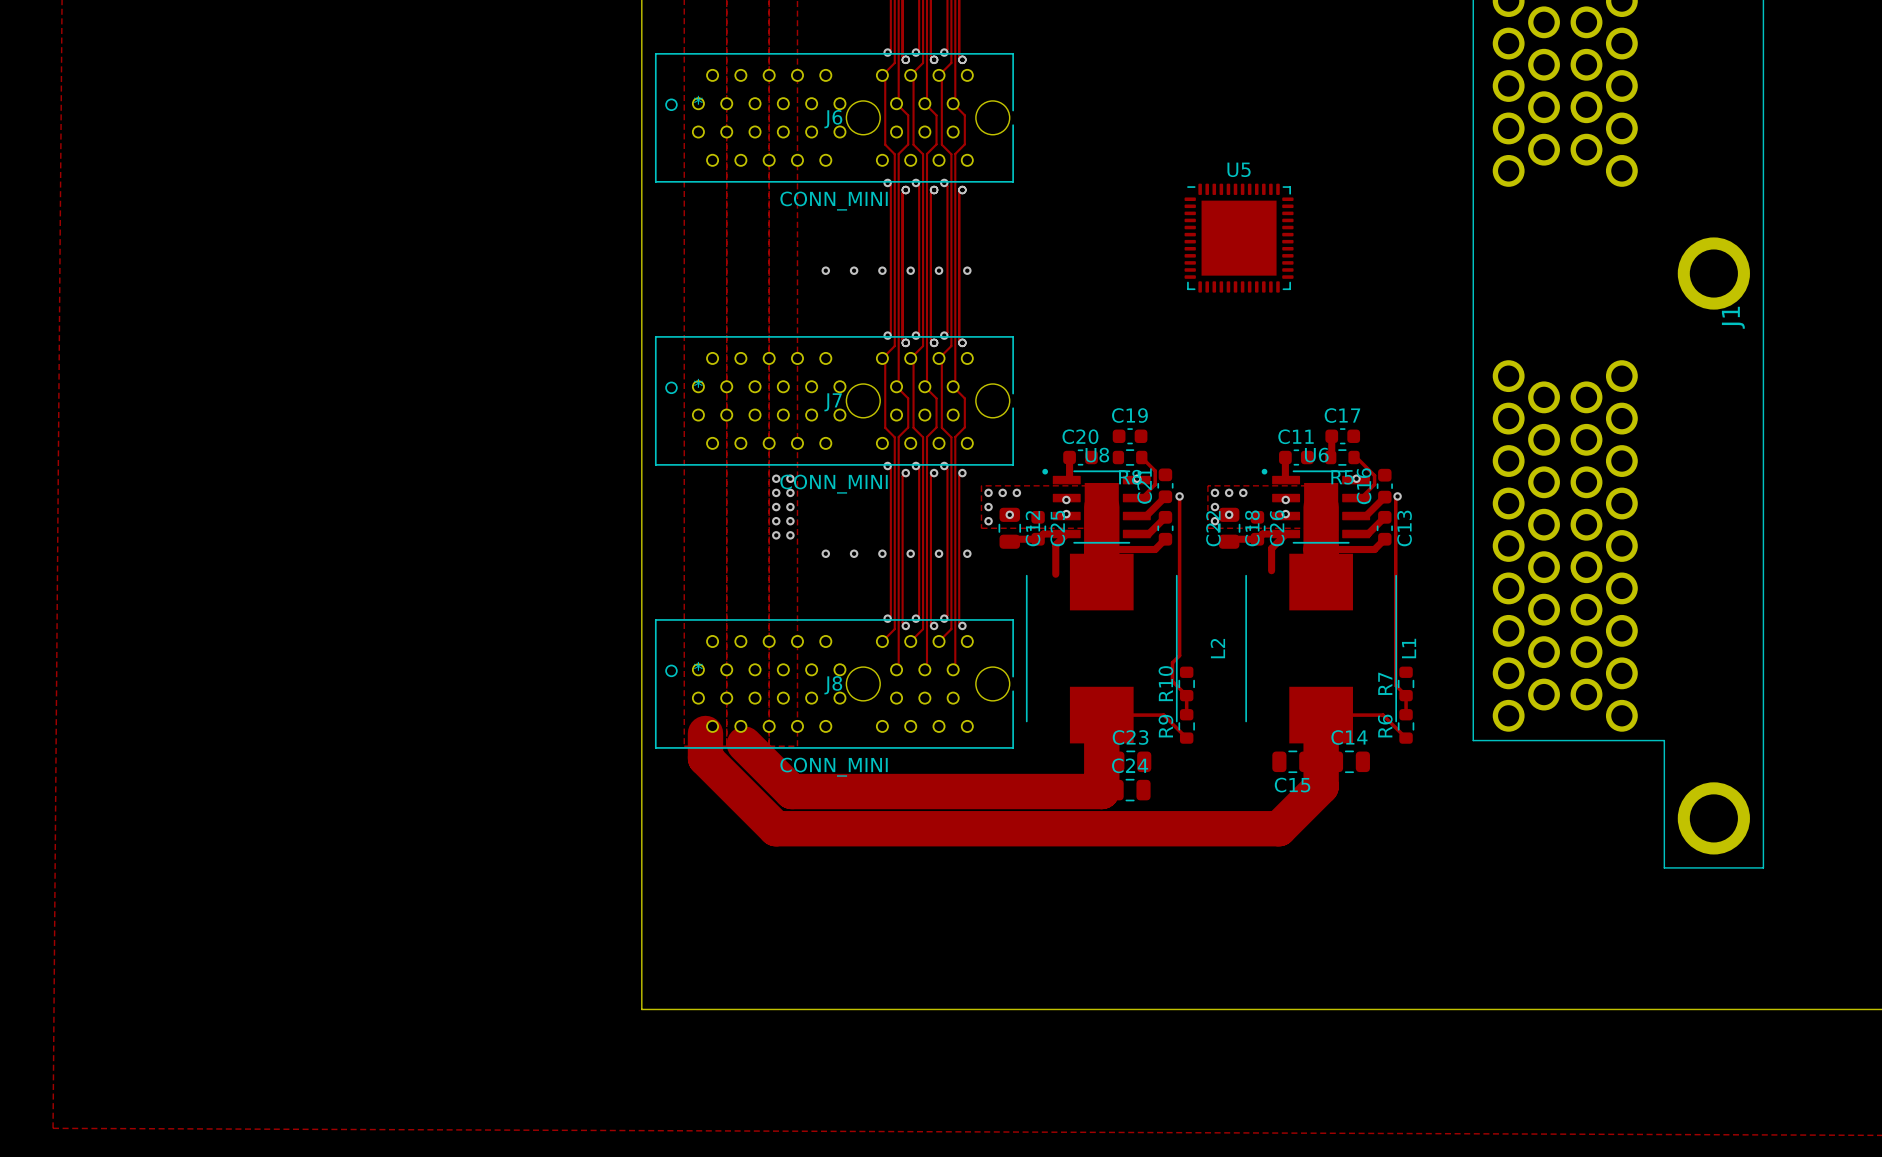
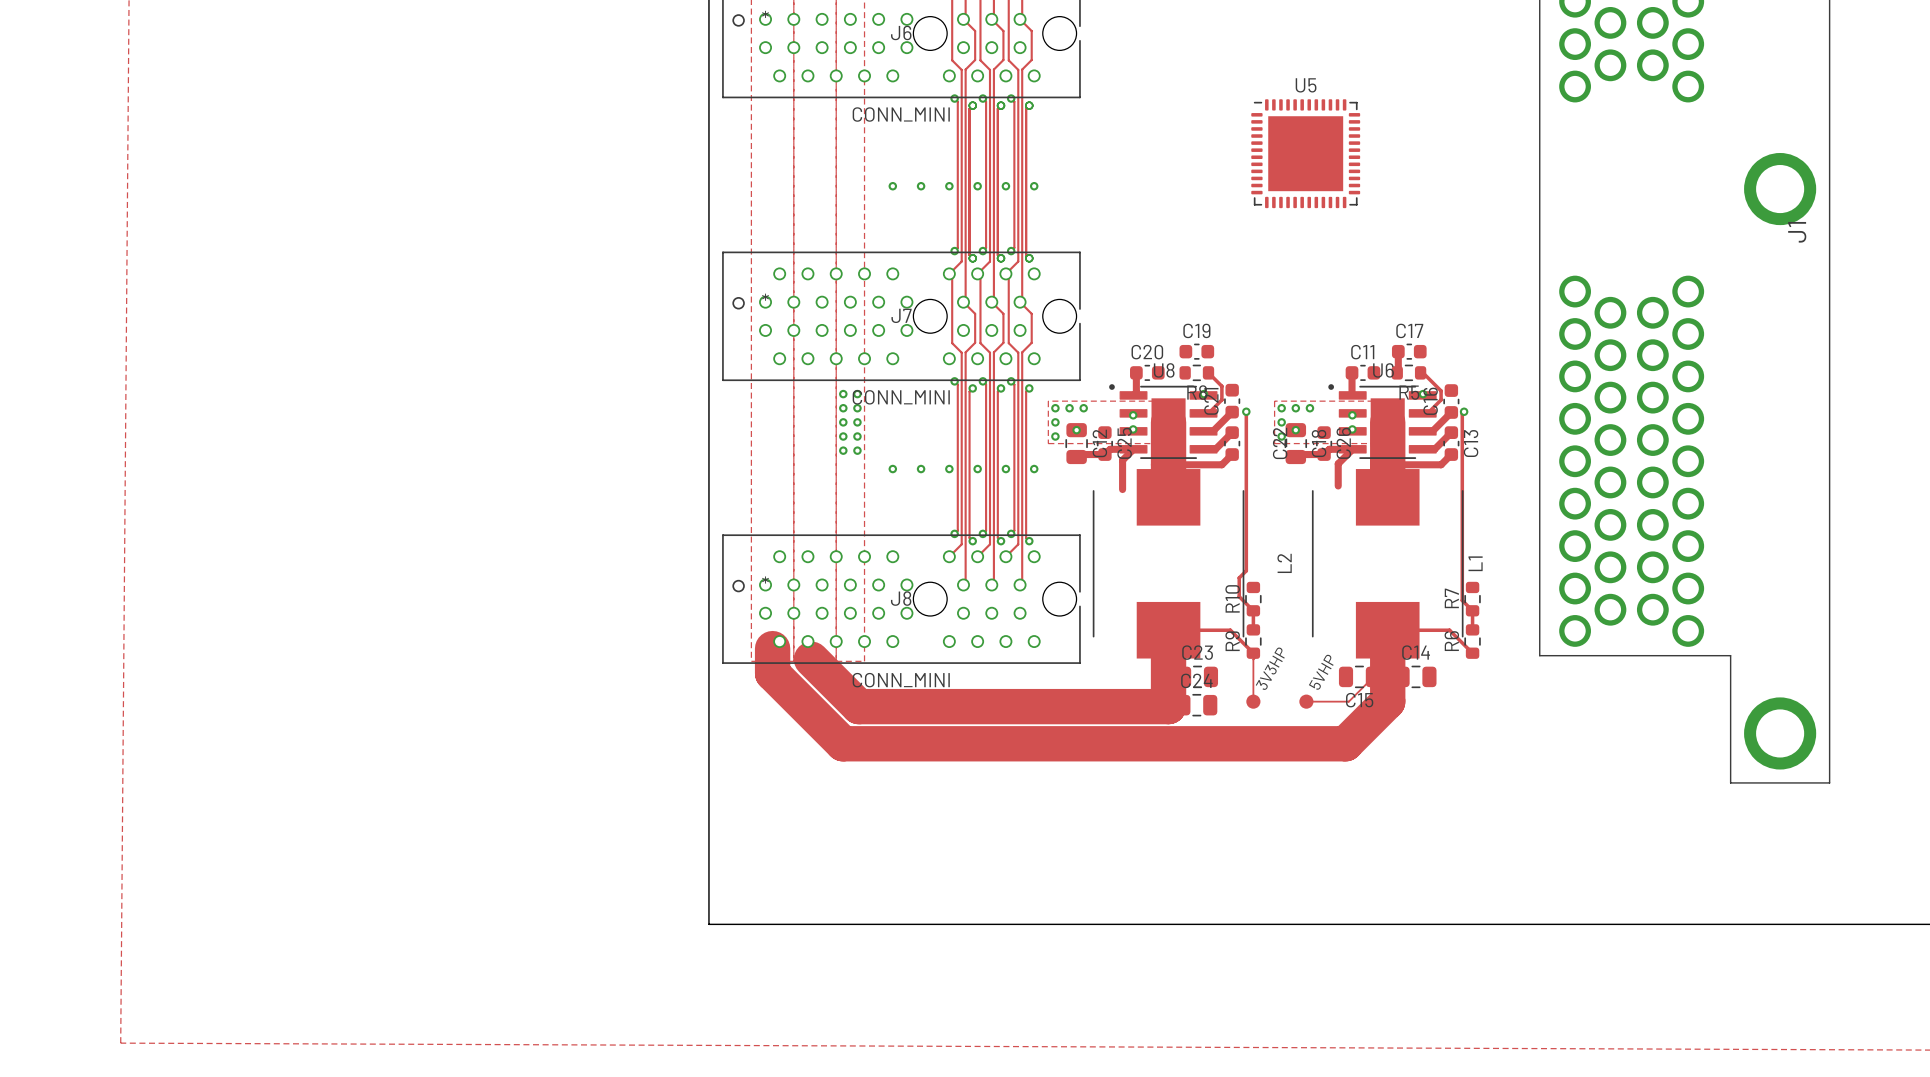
track: none -> (1256, 656) (1253, 659) (1253, 701)
track: none -> (1367, 676) (1367, 683) (1348, 701) (1306, 701)
part: none -> 3V3HP (1253, 701)
part: none -> 5VHP (1306, 701)

